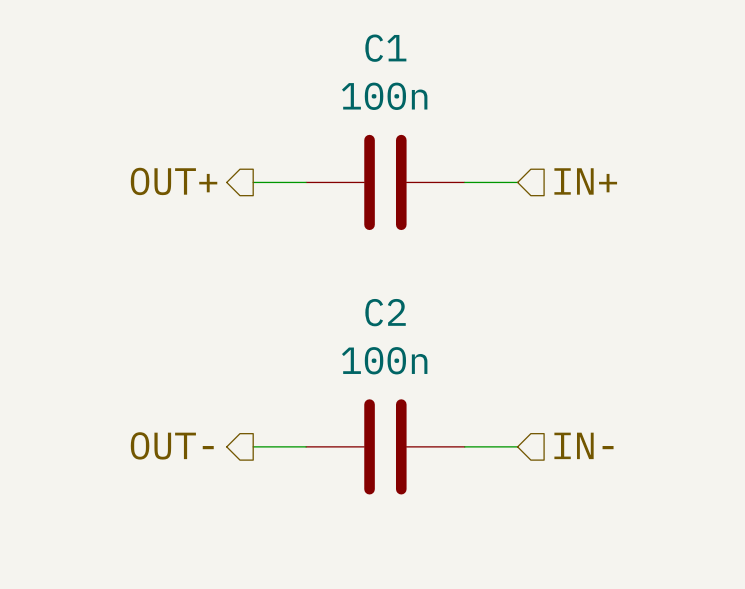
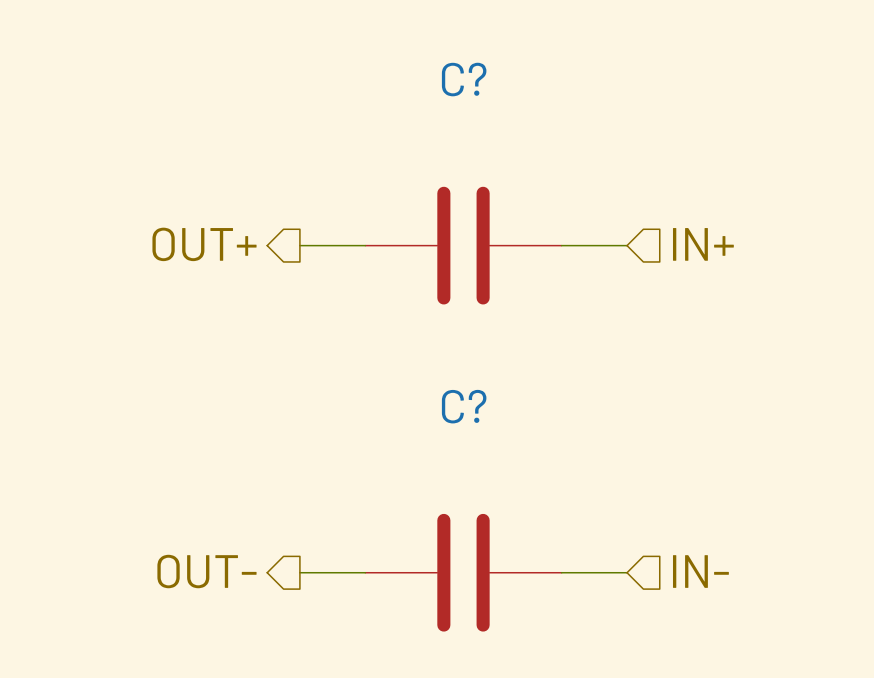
C1 name: C1 (385, 48) -> C? (464, 79)
C1 value: 100n (384, 96) -> none
C2 name: C2 (385, 312) -> C? (464, 406)
C2 value: 100n (384, 360) -> none

